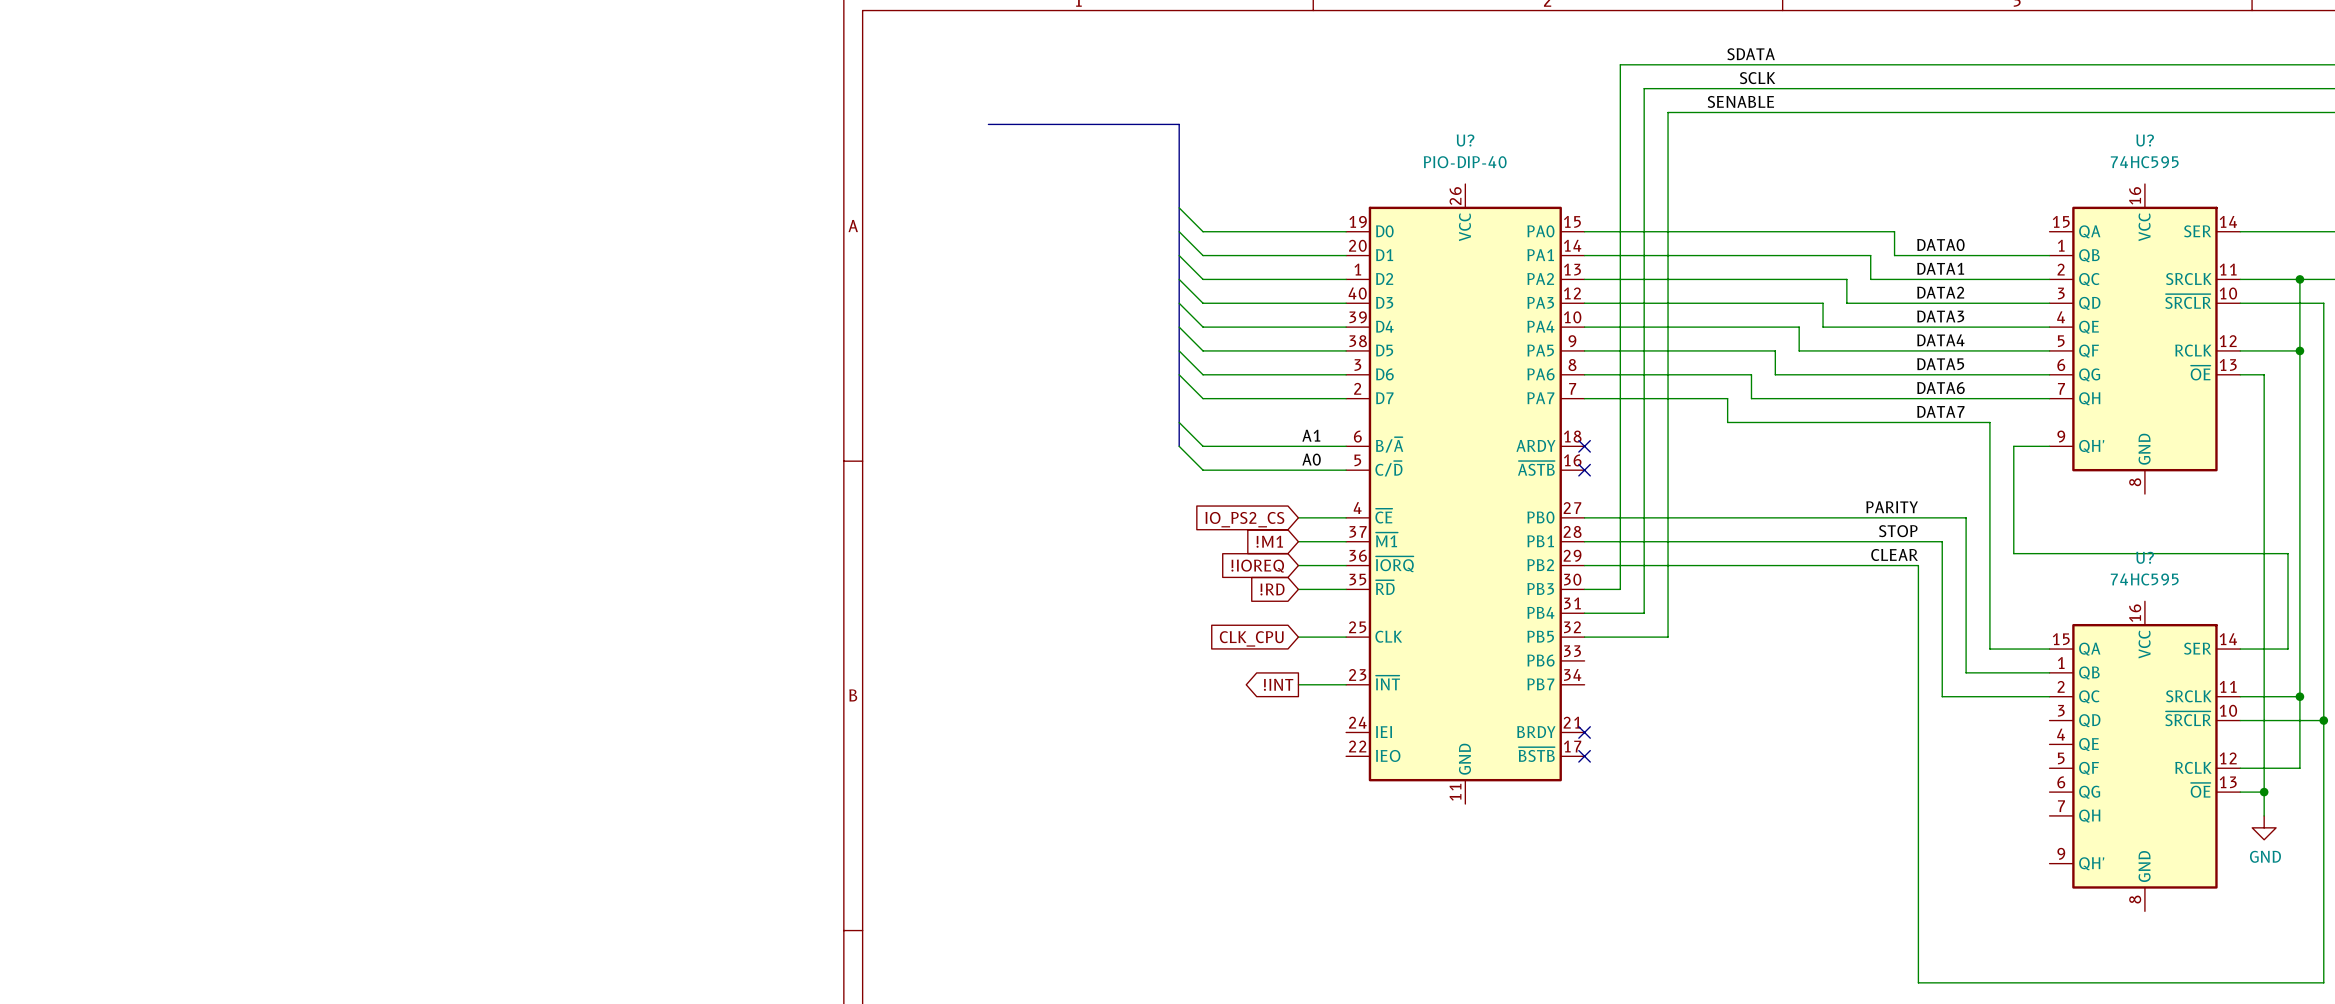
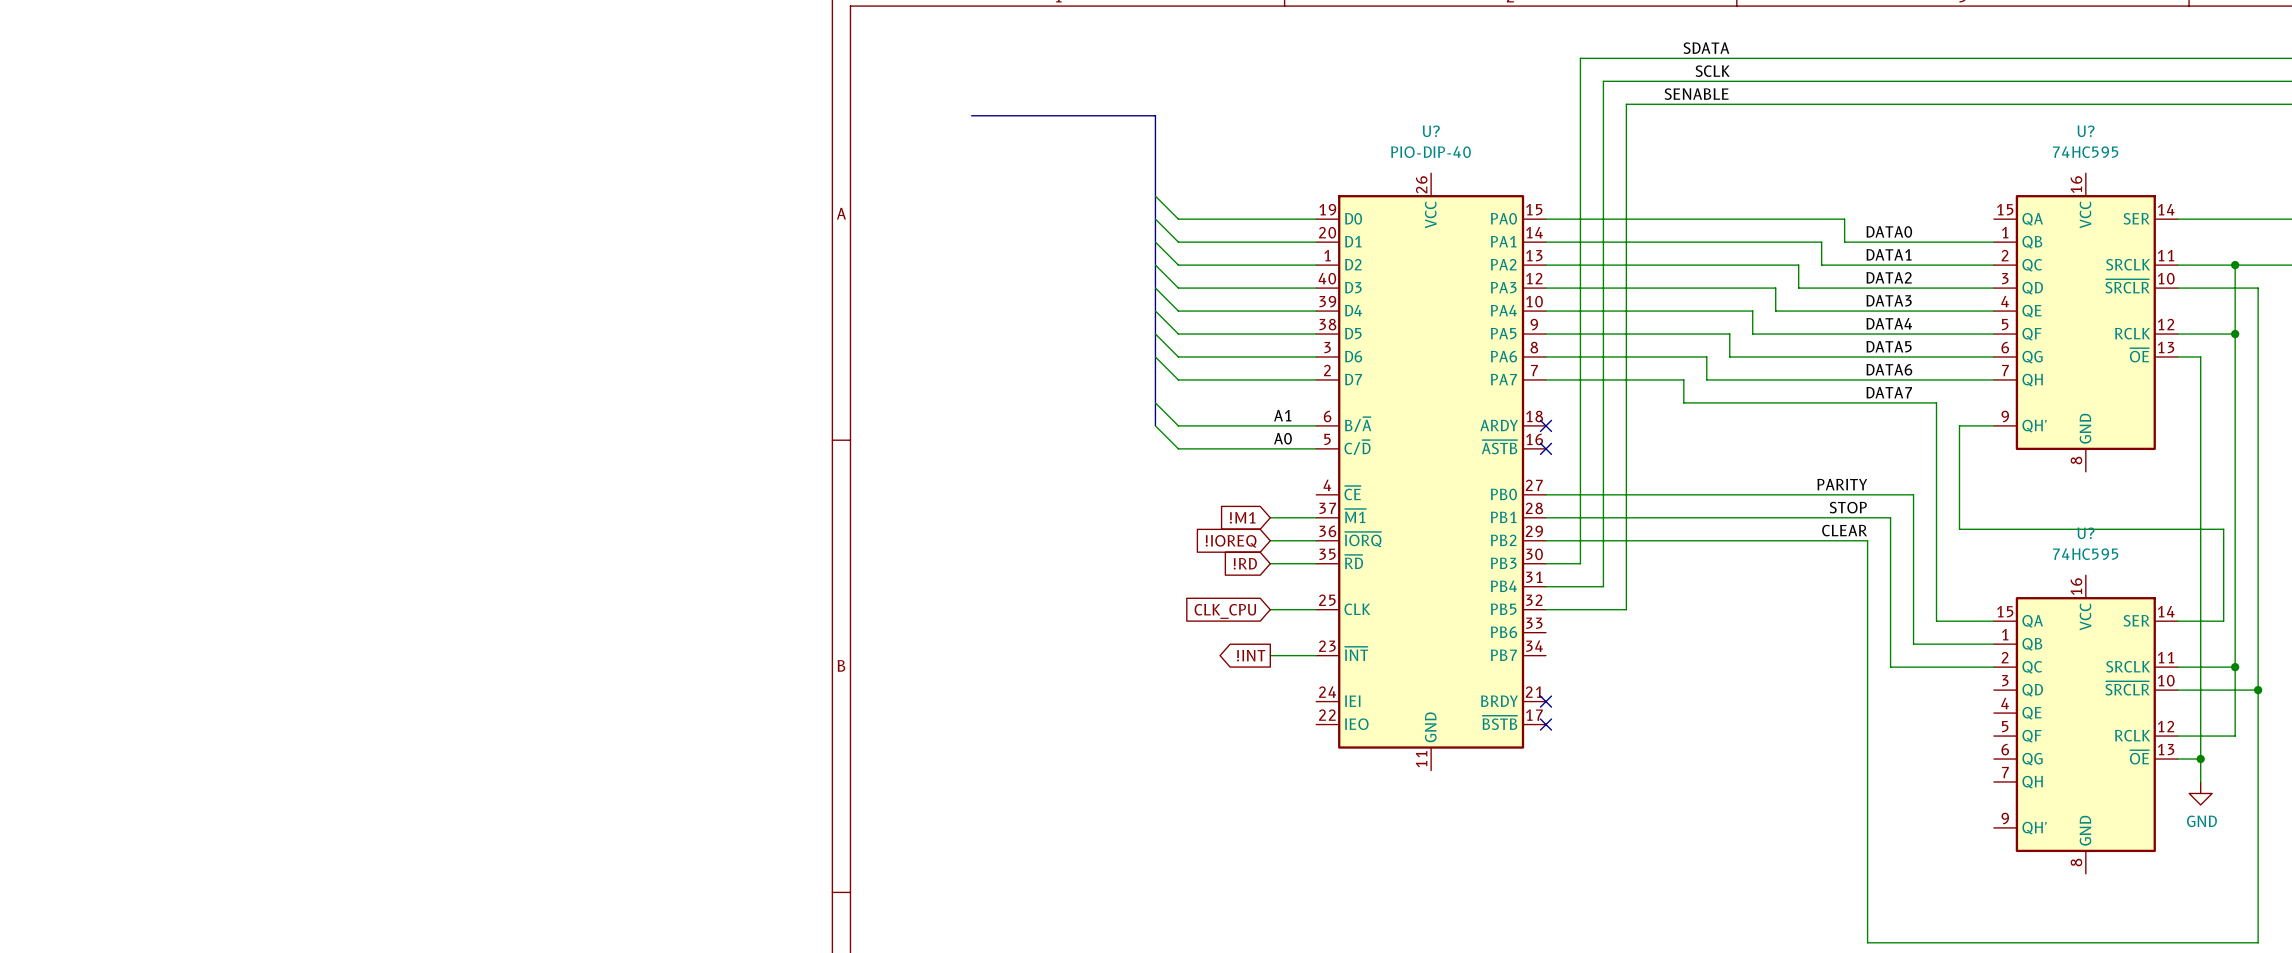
wire: (1298, 517) (1346, 517) -> none
global label: IO_PS2_CS (1244, 519) -> none

